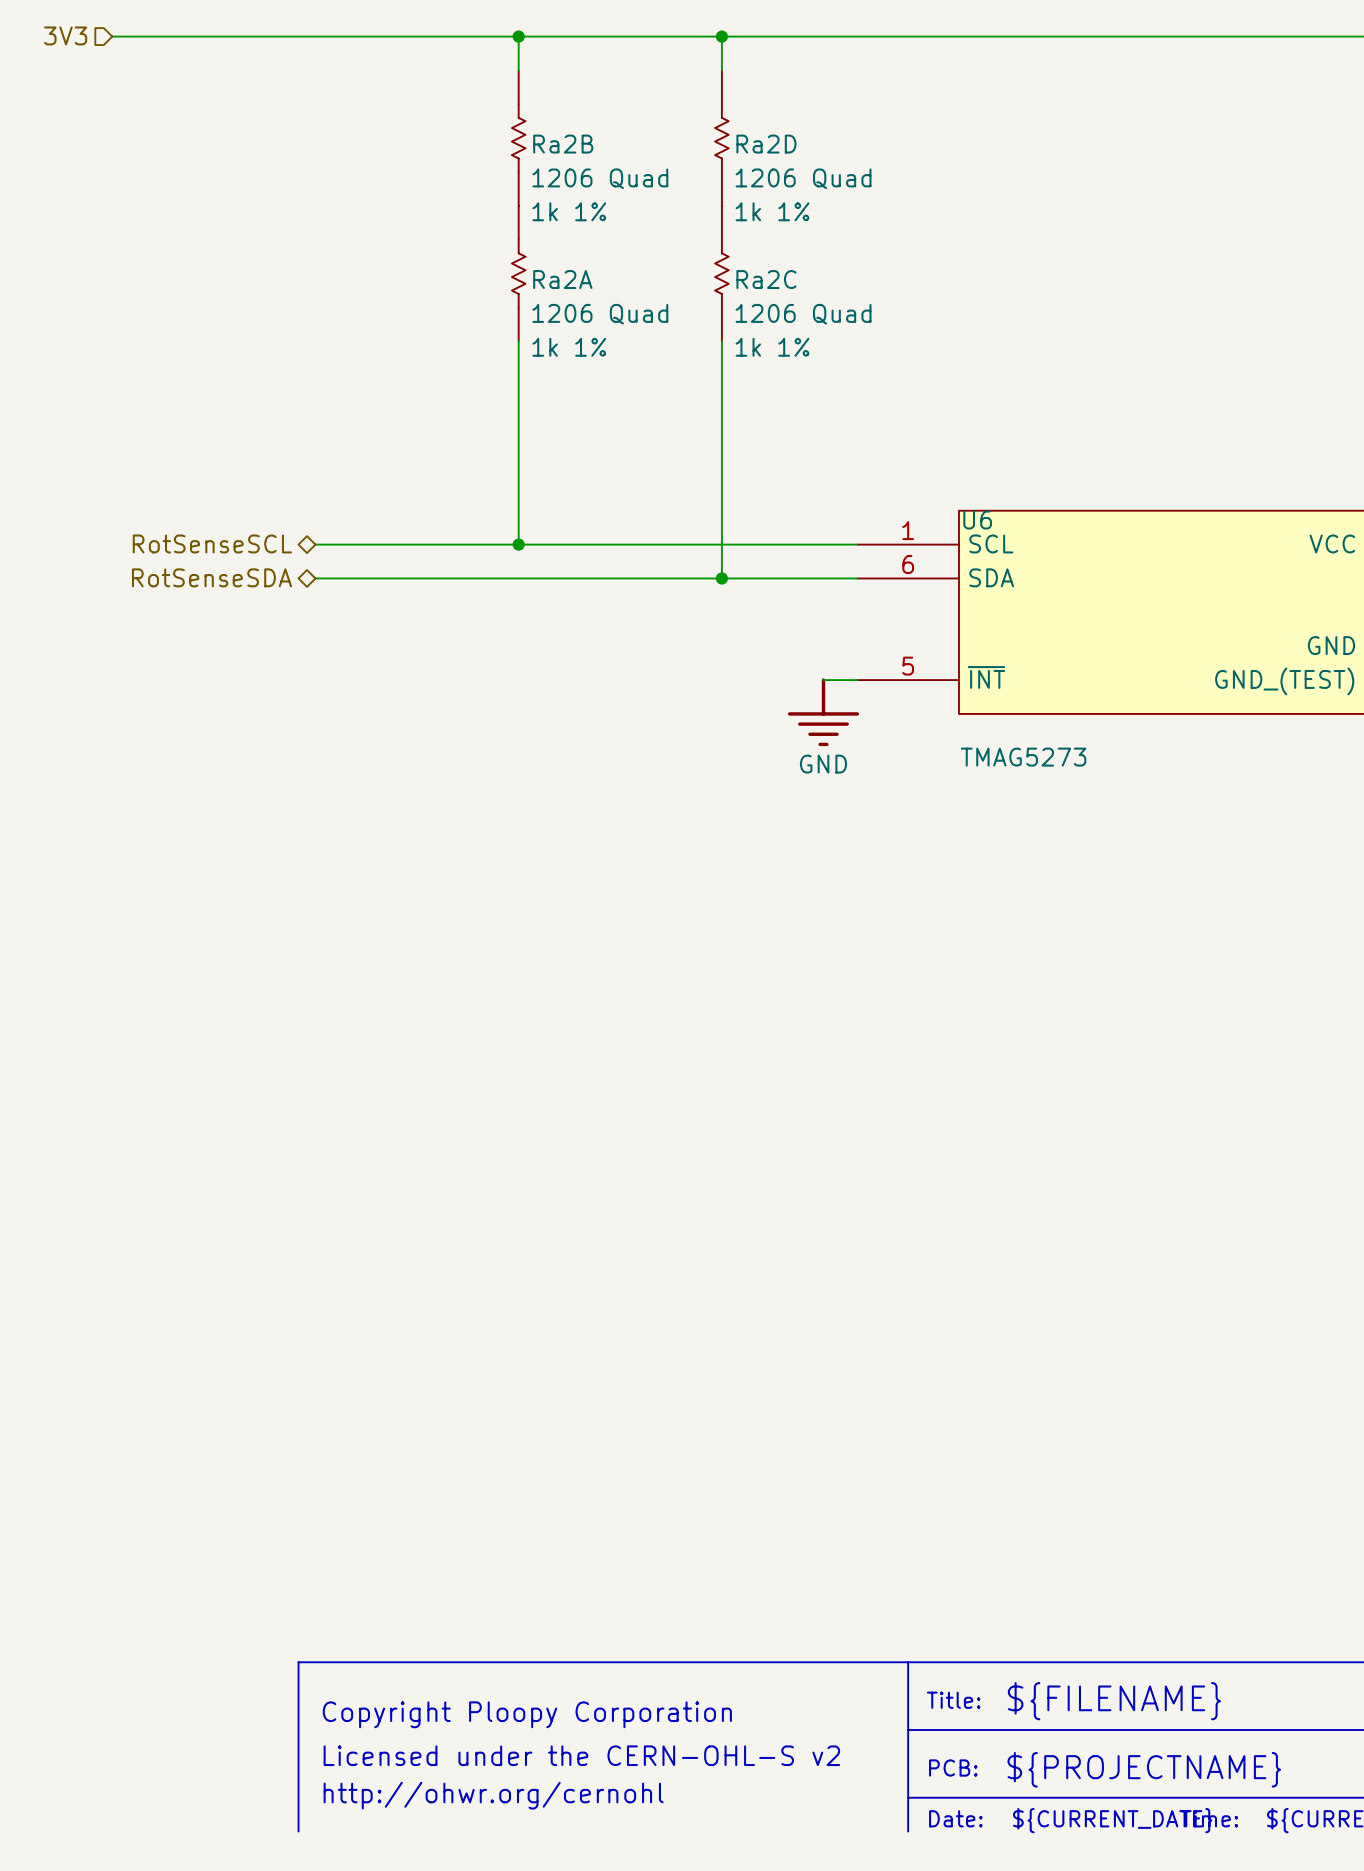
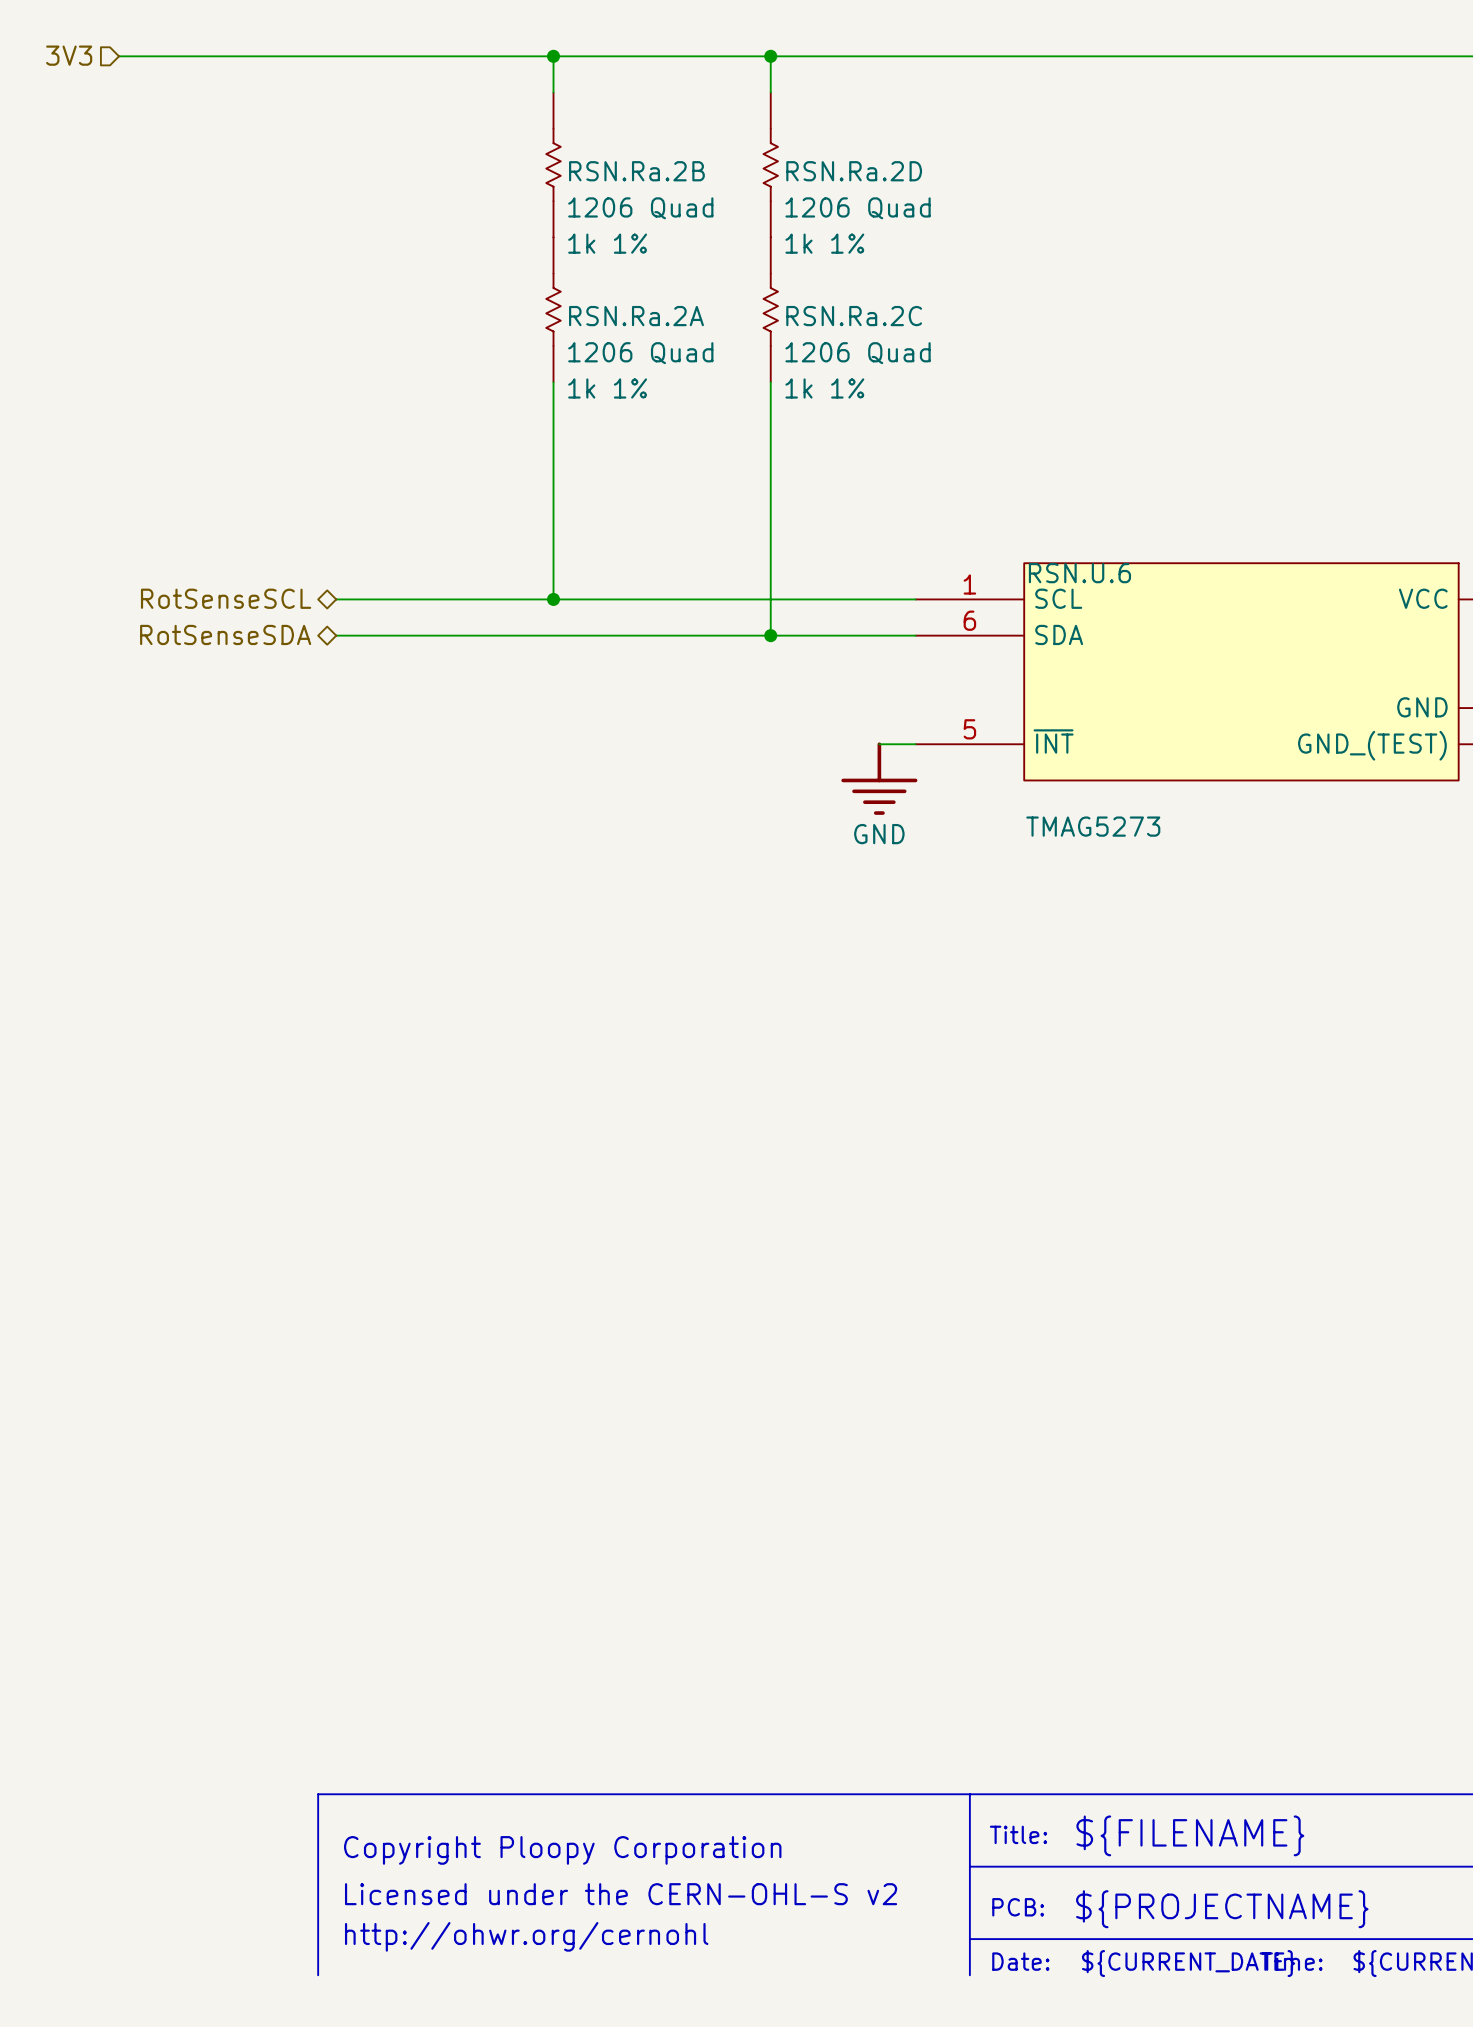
Ra2B name: Ra2B (563, 144) -> RSN.Ra.2B (636, 171)
Ra2D name: Ra2D (766, 144) -> RSN.Ra.2D (854, 171)
Ra2A name: Ra2A (562, 279) -> RSN.Ra.2A (636, 316)
Ra2C name: Ra2C (766, 279) -> RSN.Ra.2C (854, 316)
U6 name: U6 (977, 520) -> RSN.U.6 (1079, 573)

